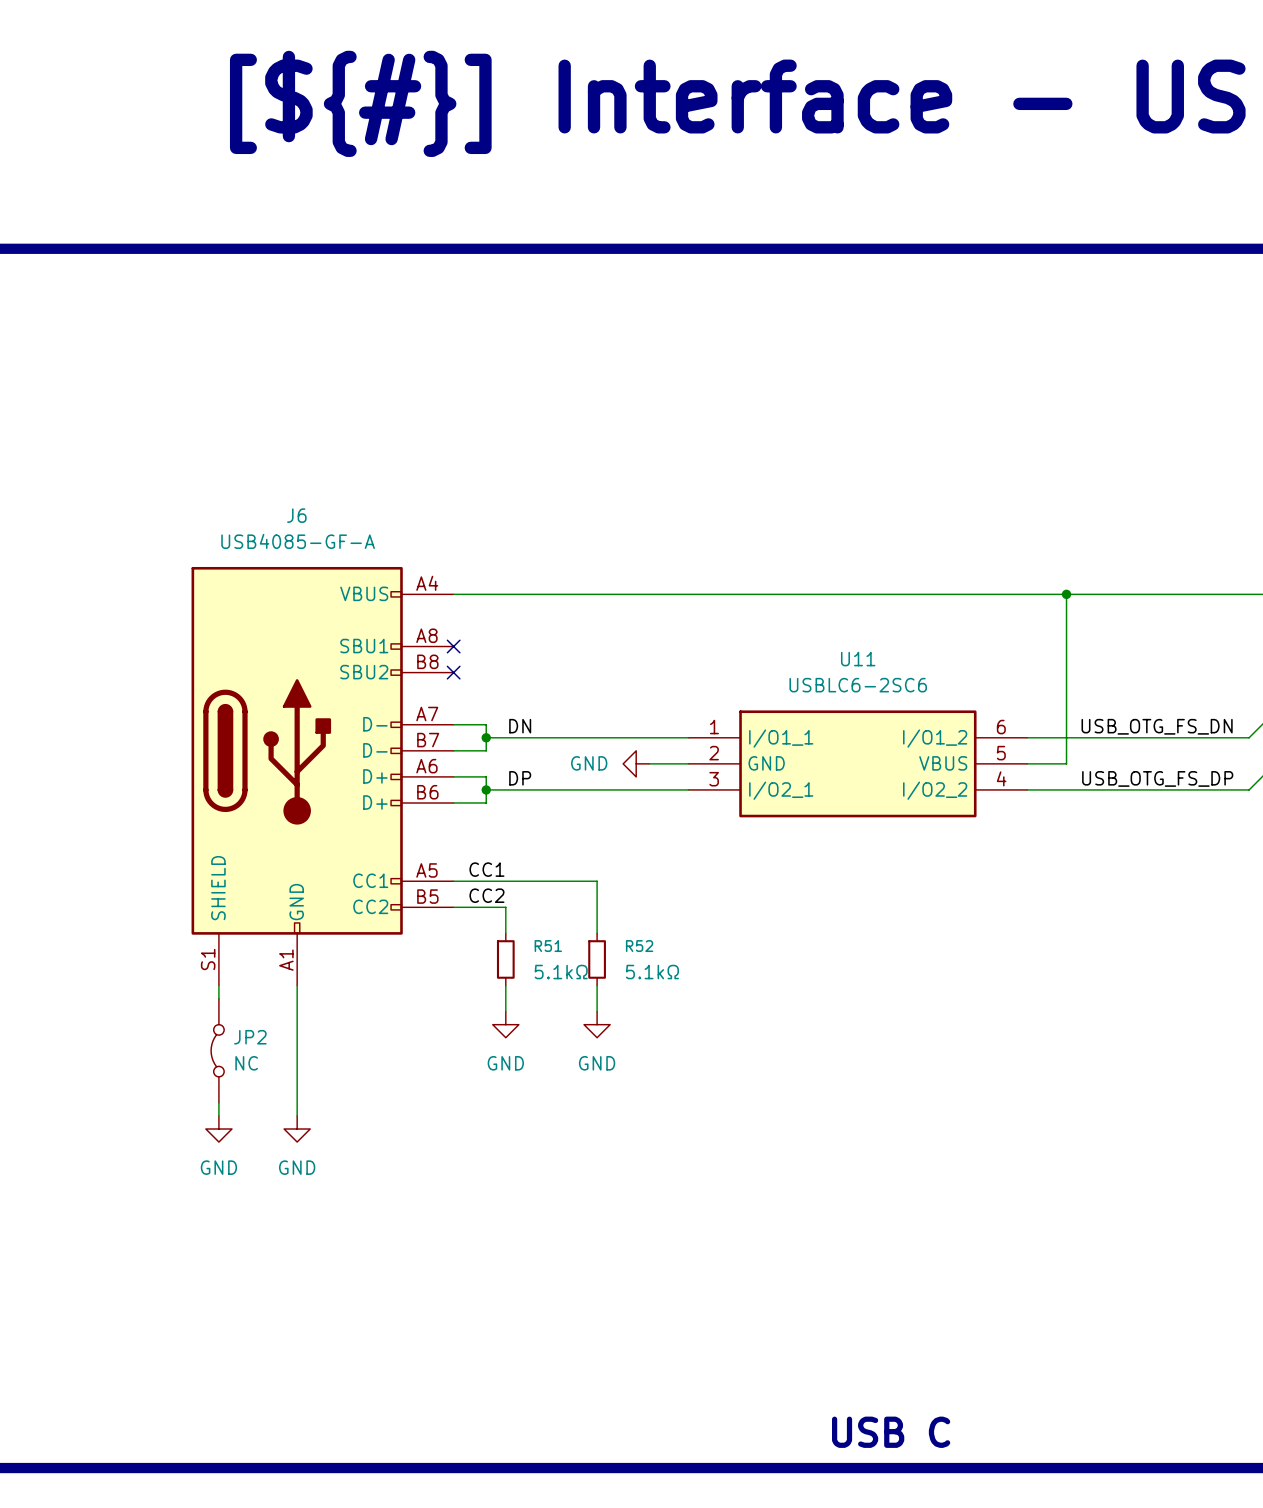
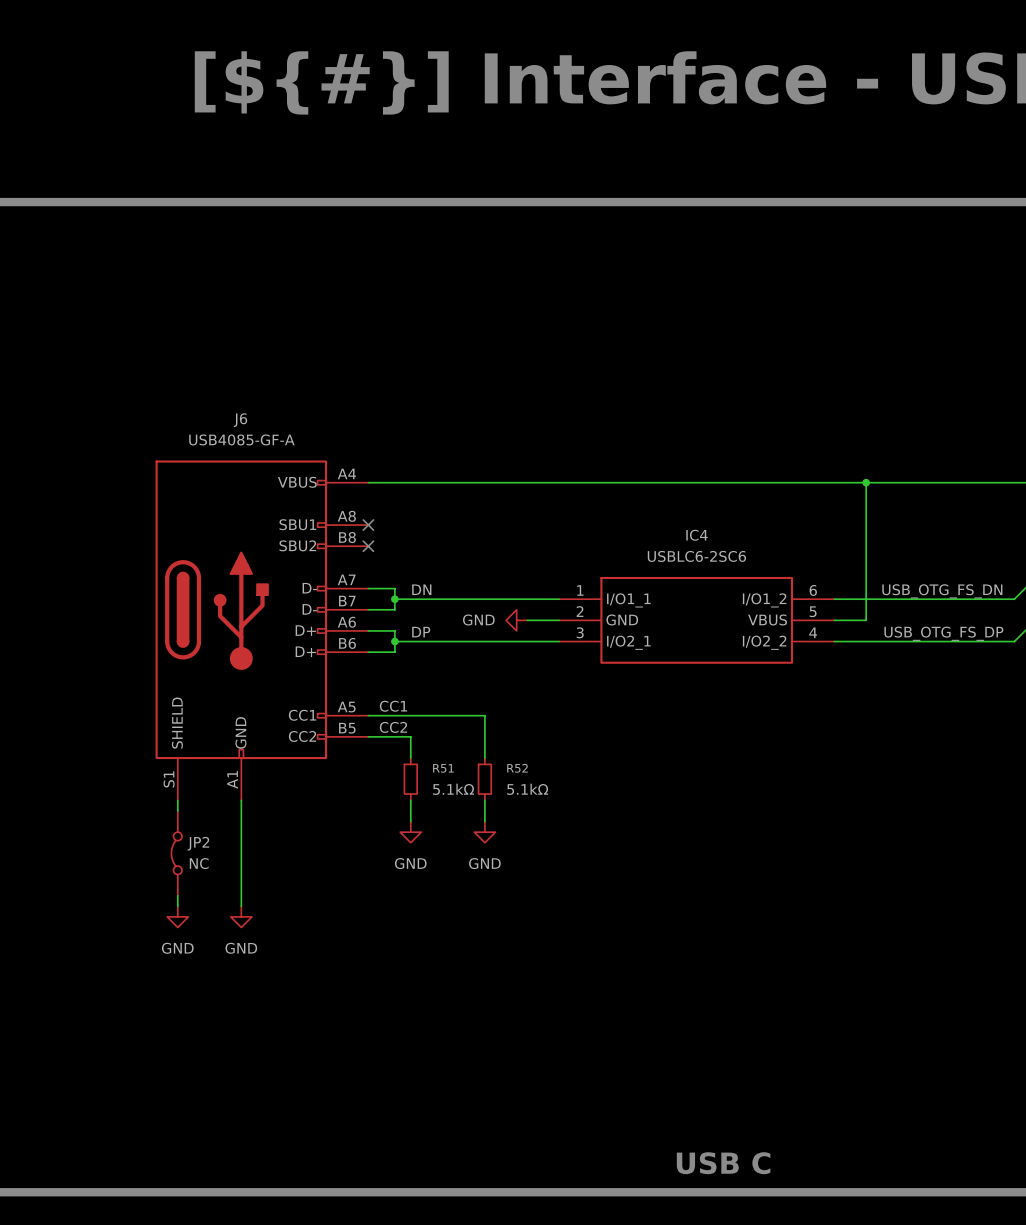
U11 name: U11 (858, 659) -> IC4 (697, 535)

